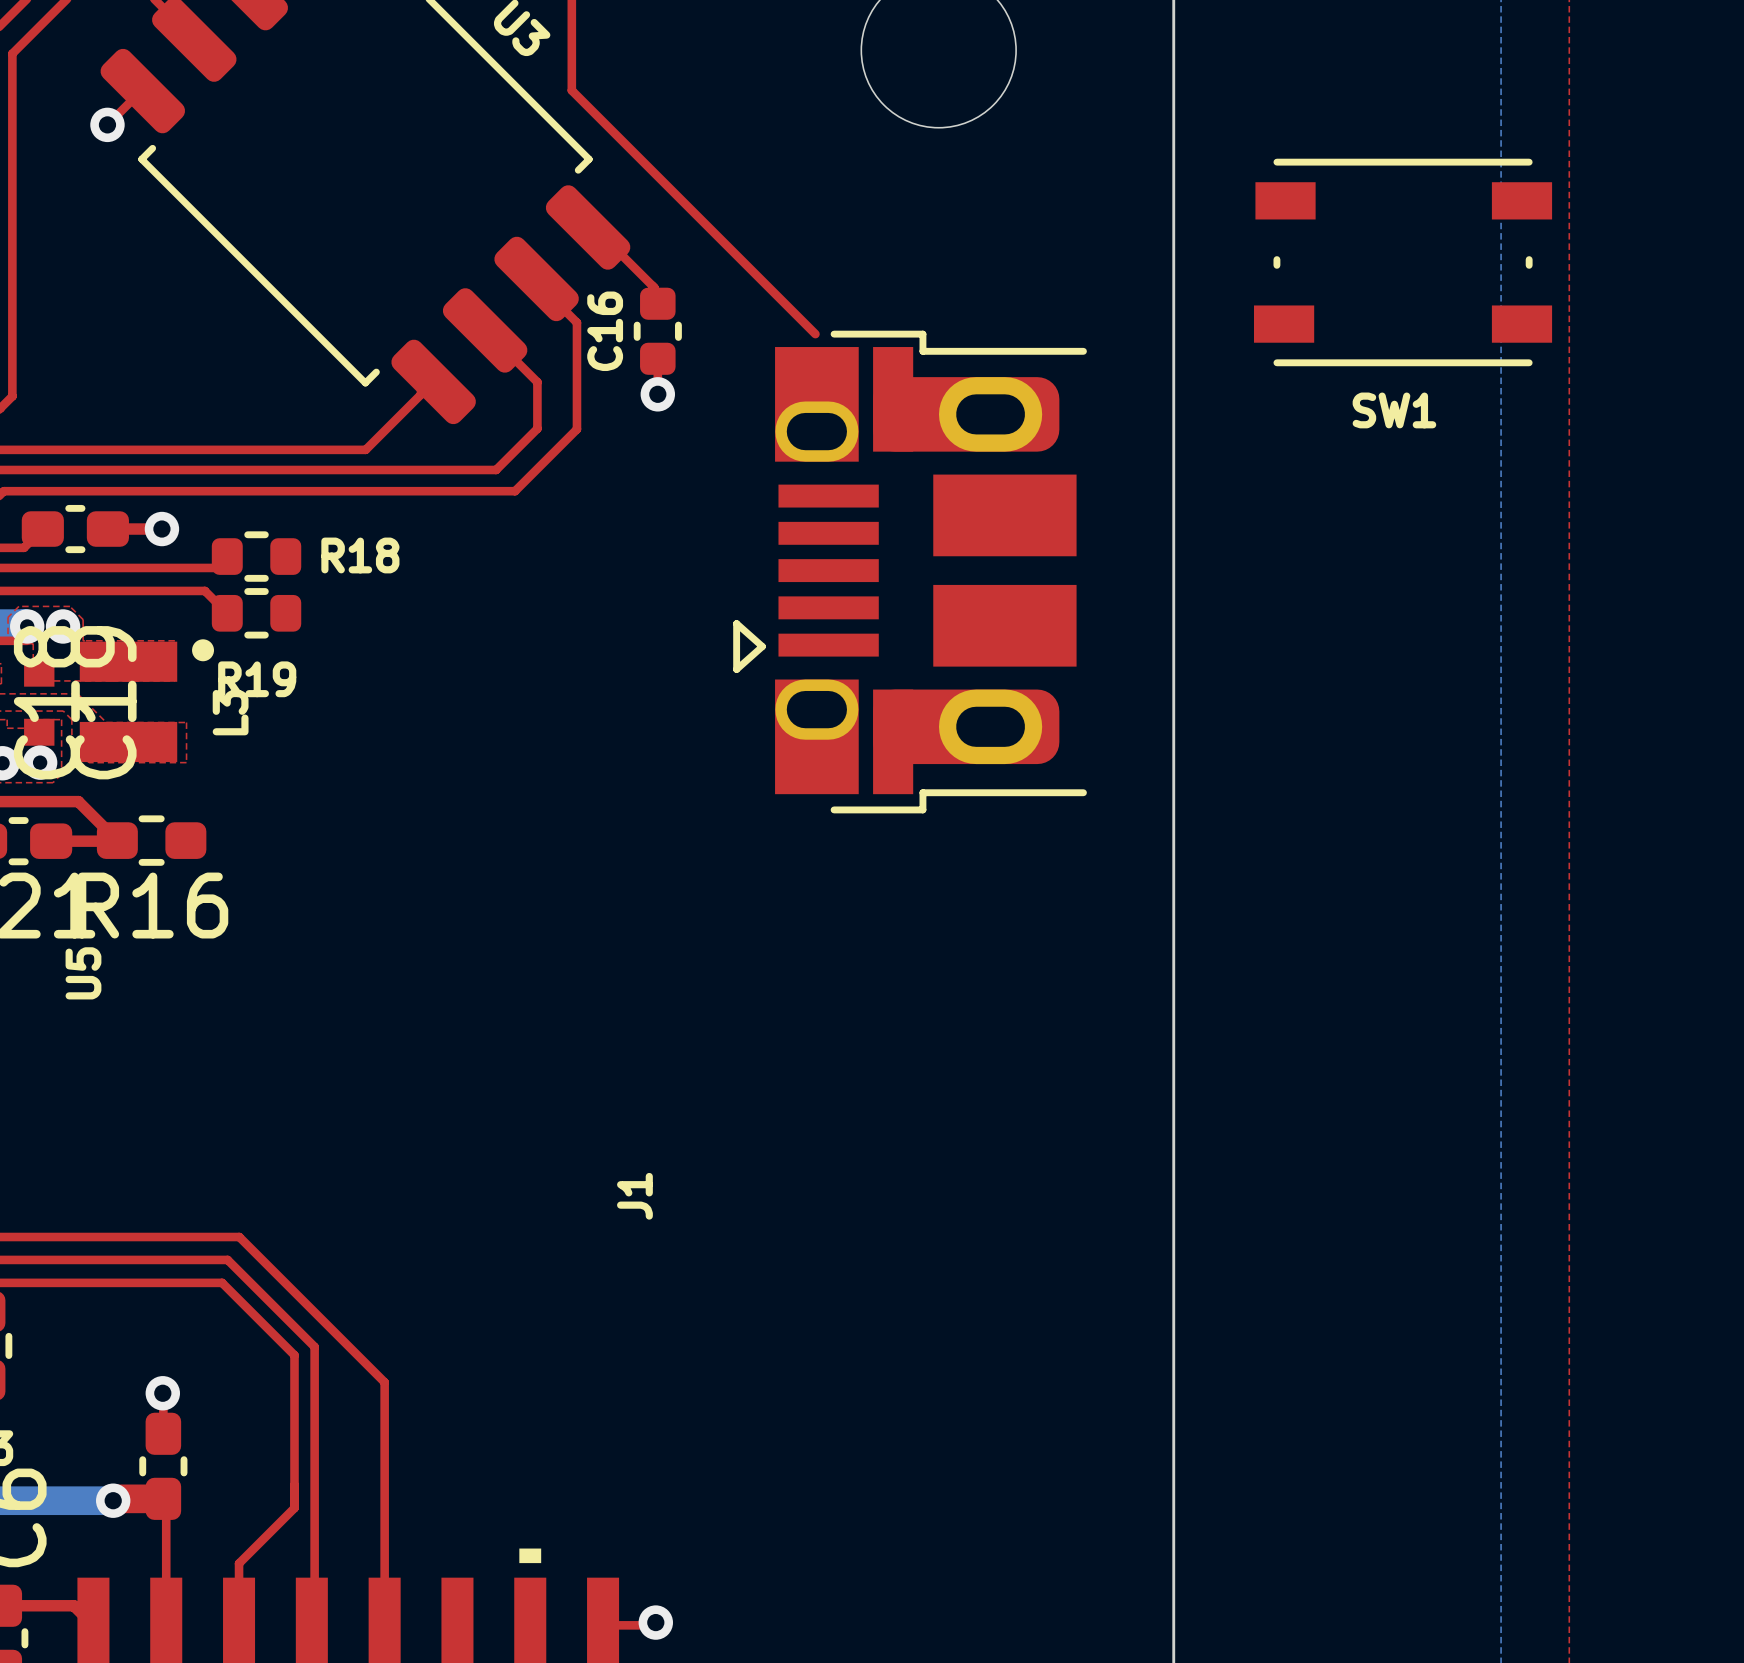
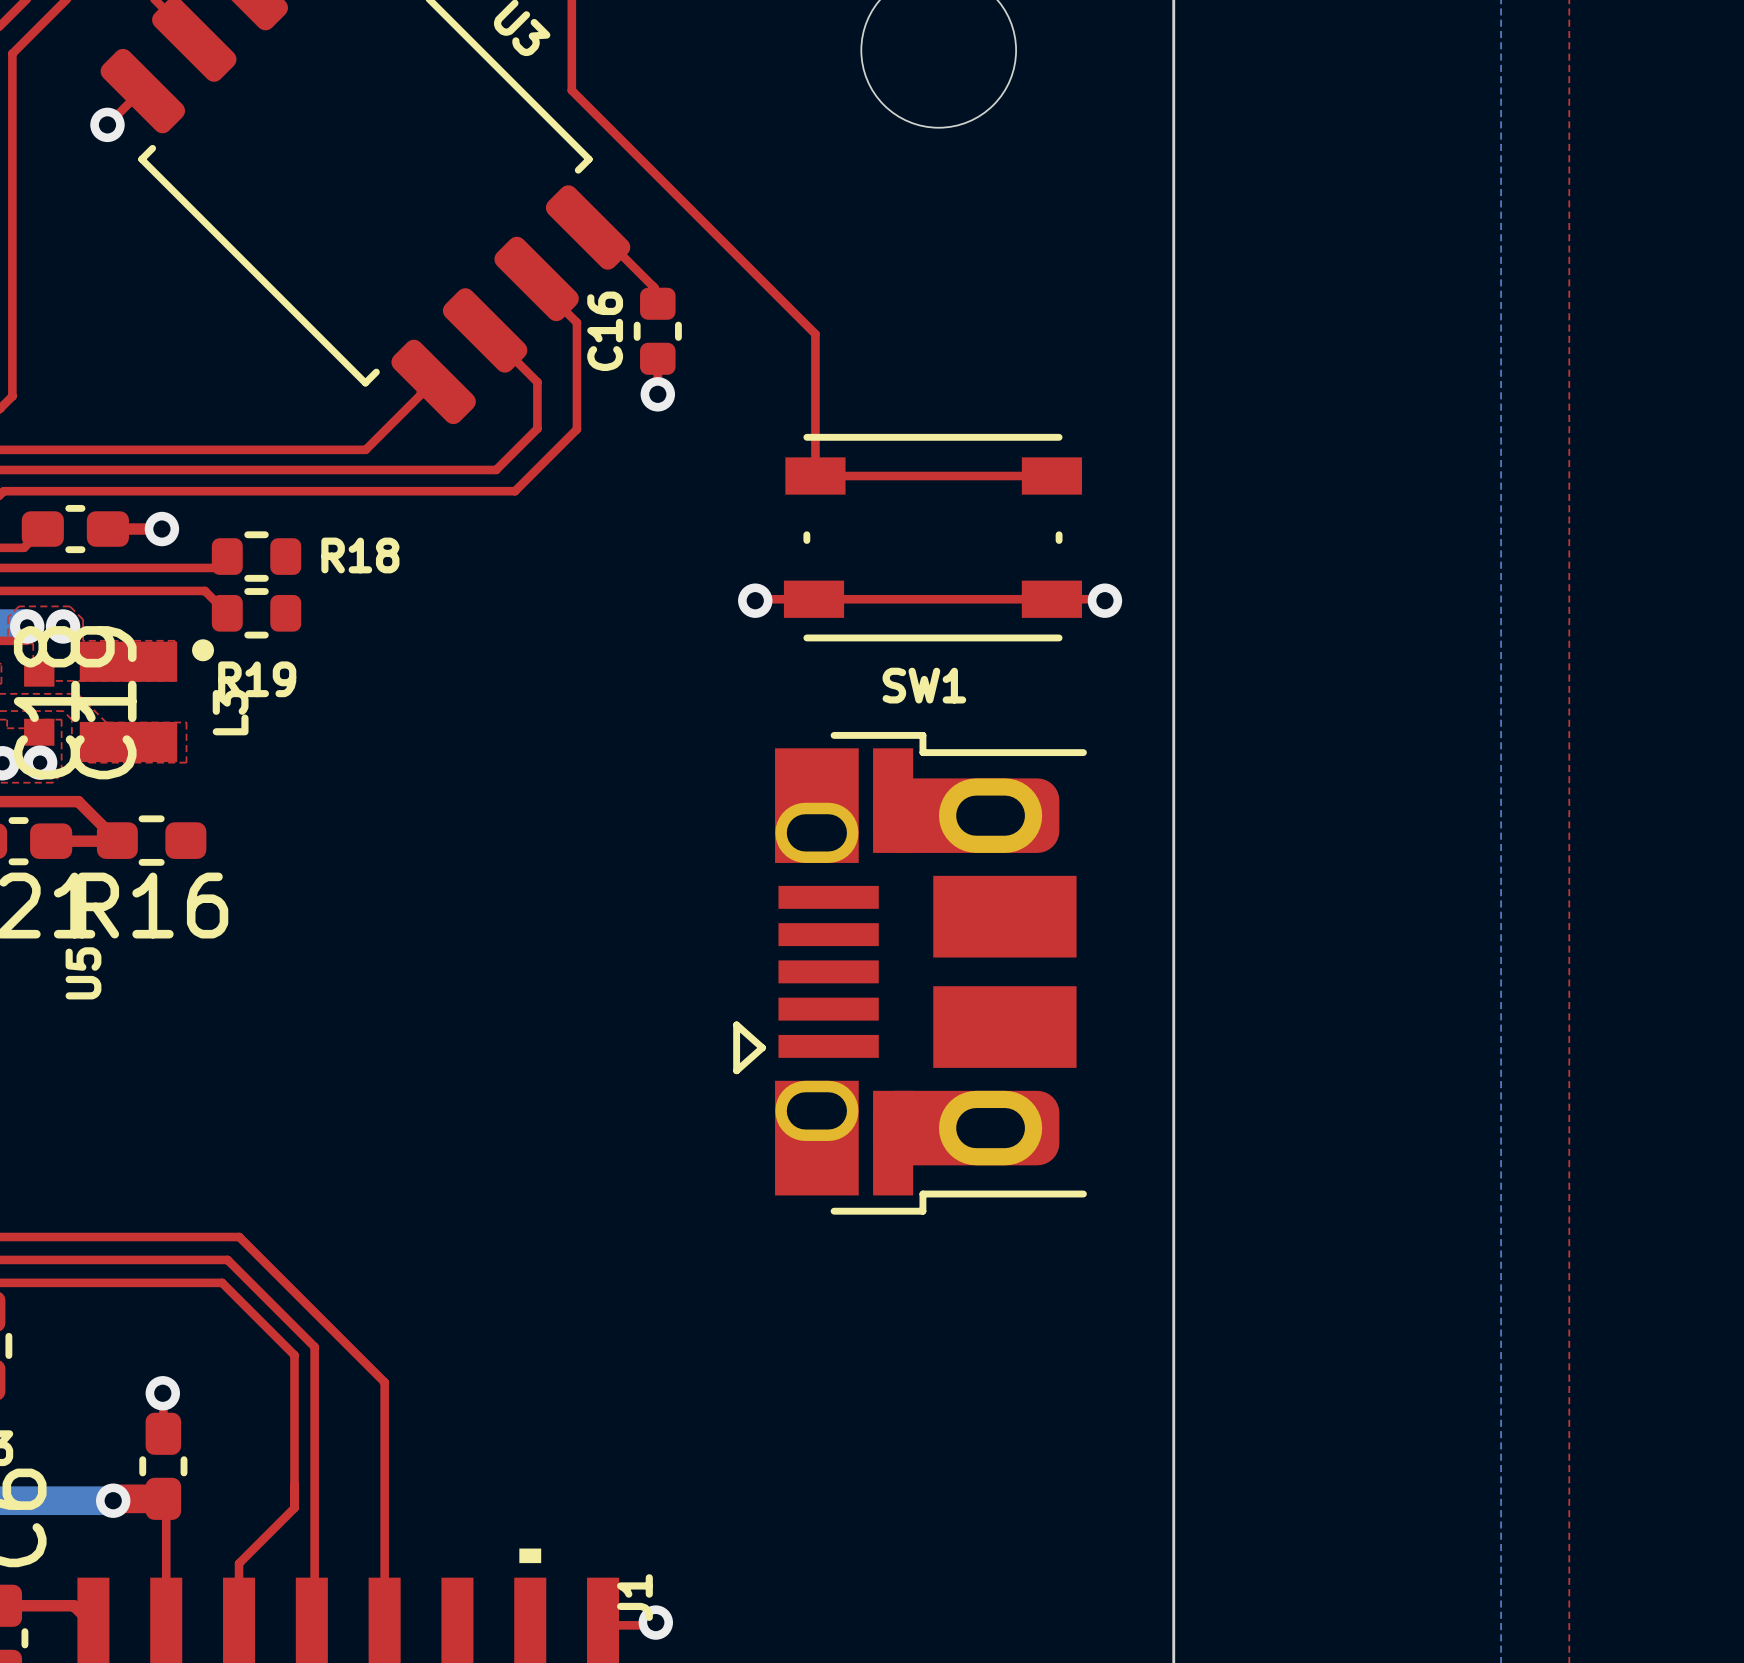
SW1 position: (1403, 262) -> (932, 537)
top track: none -> (815, 334) (815, 476) (1051, 476)
J1 position: (910, 572) -> (910, 973)
top track: none -> (755, 600) (1104, 600)
via: none -> (755, 600)
via: none -> (1104, 600)

